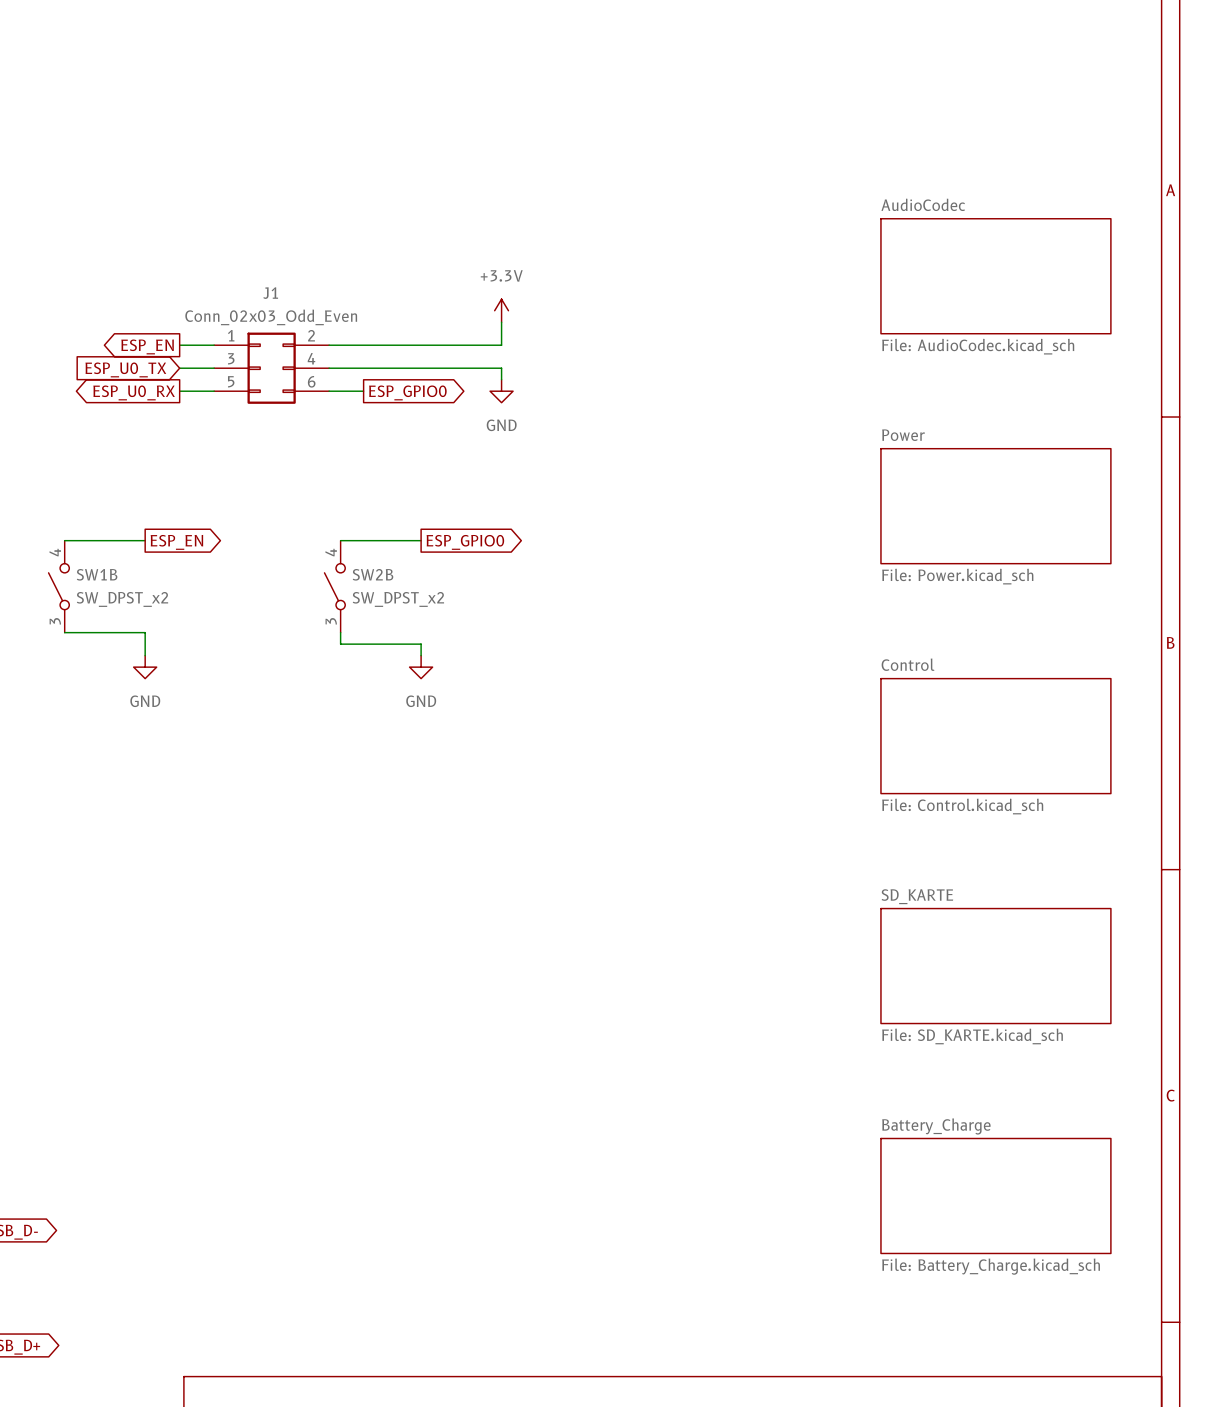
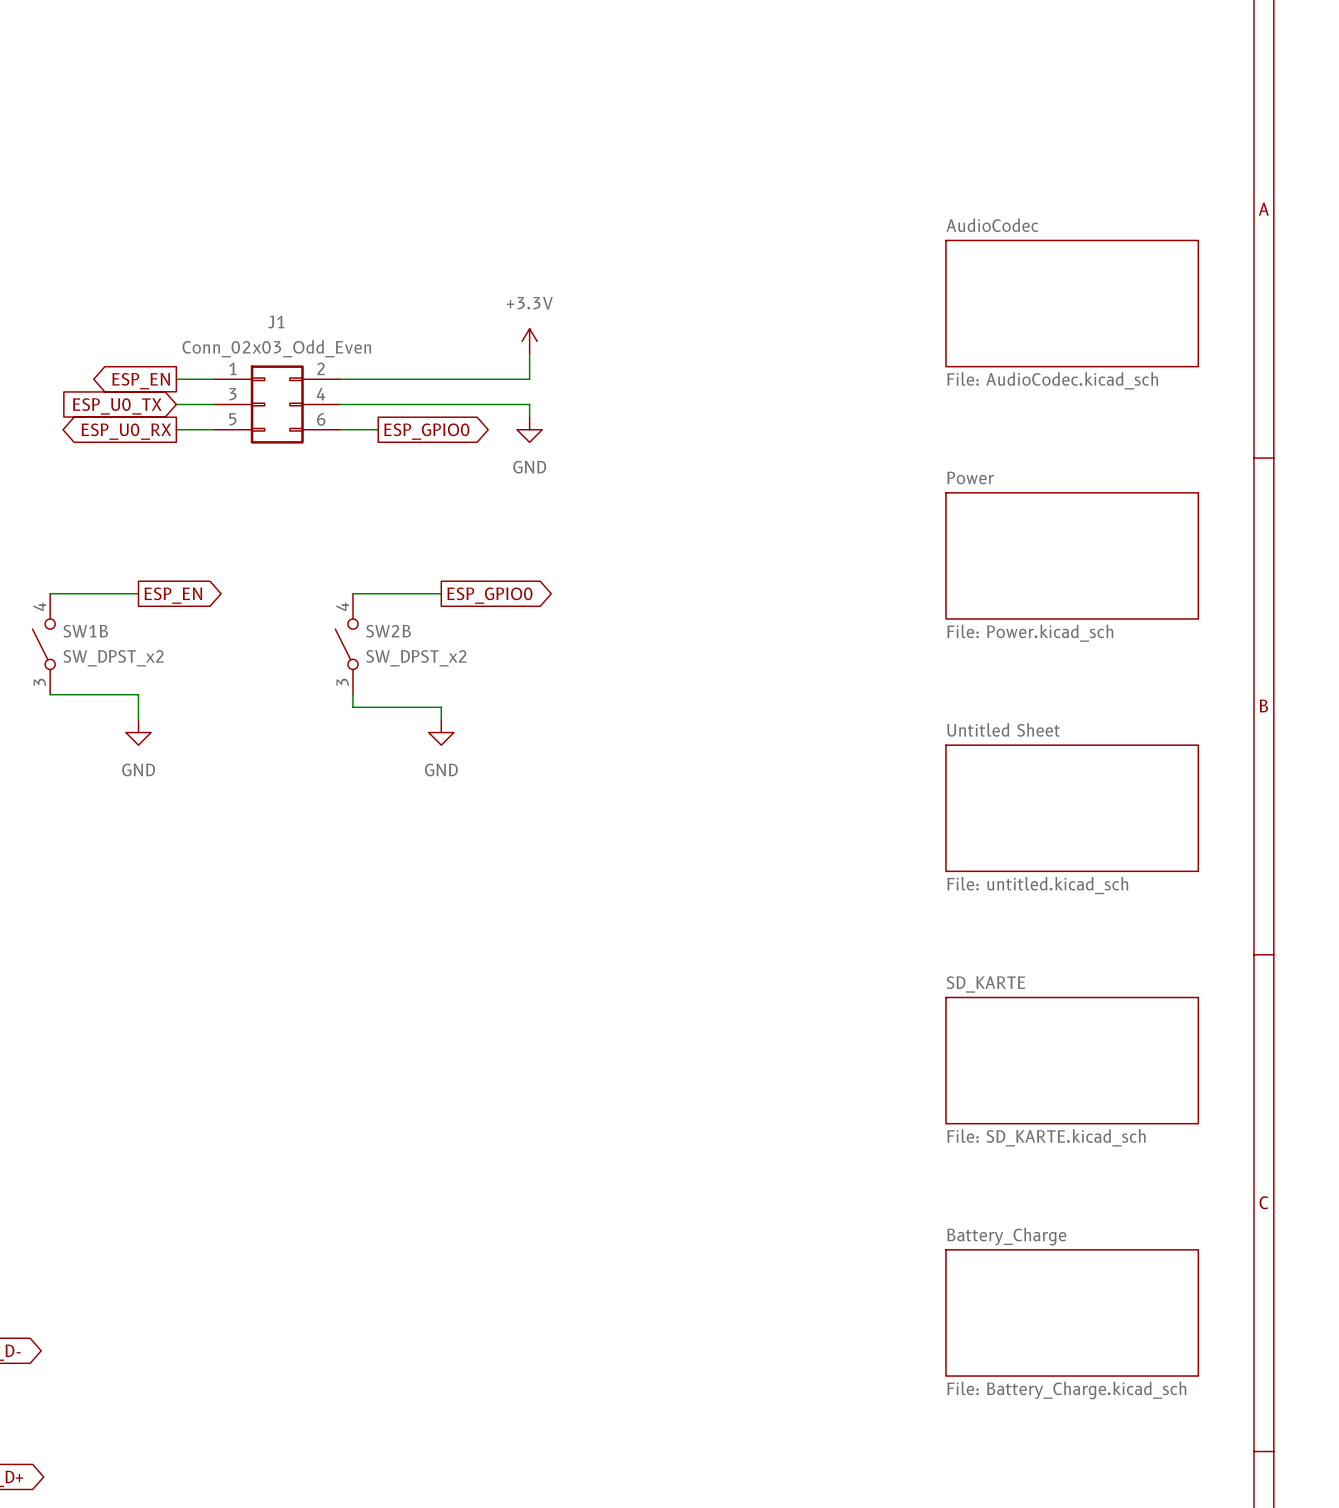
sheet Control name: Control (908, 664) -> Untitled Sheet (1003, 729)
sheet Control value: File: Control.kicad_sch (962, 806) -> File: untitled.kicad_sch (1037, 885)

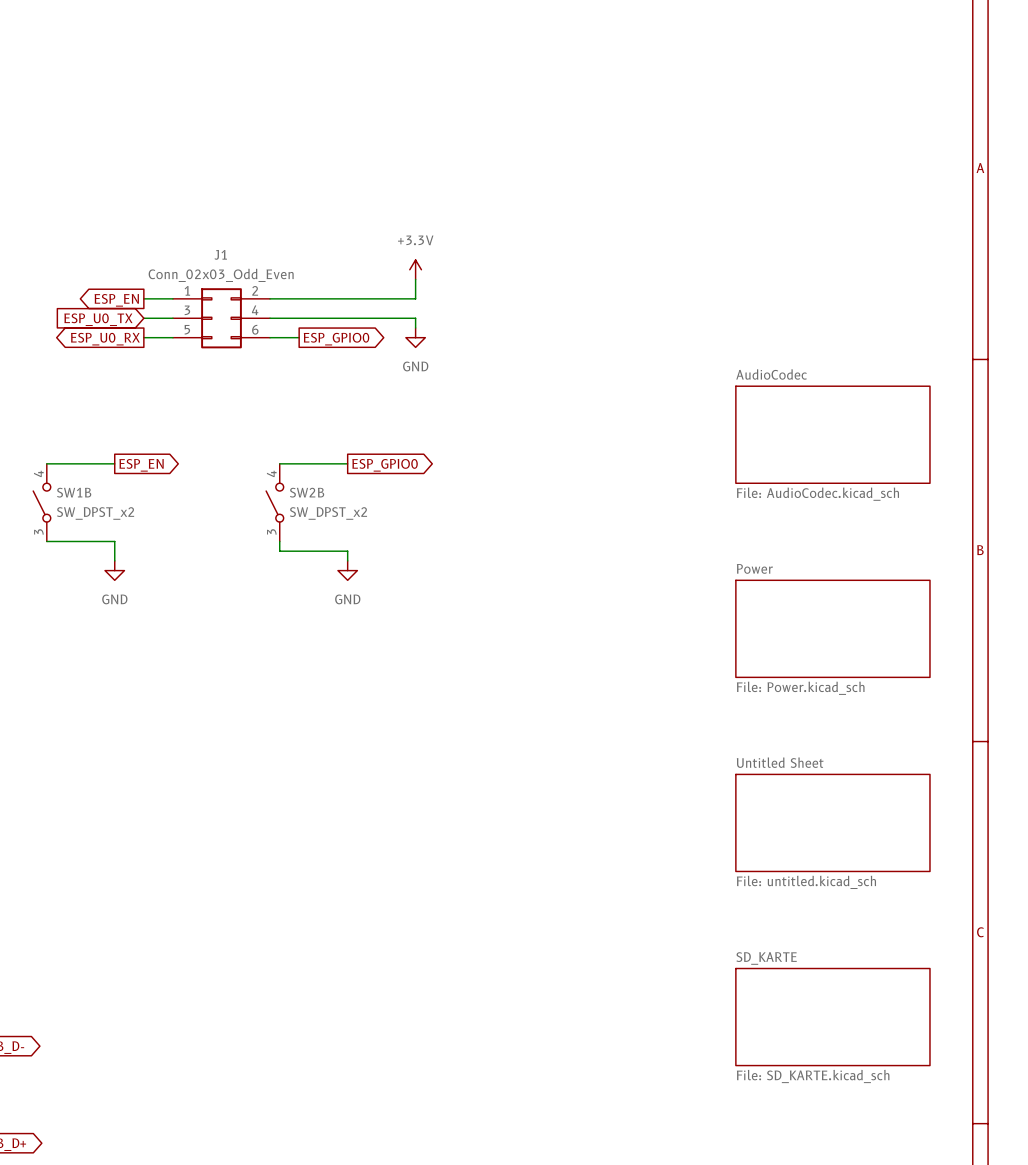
sheet AudioCodec: File: AudioCodec.kicad_sch (1072, 303) -> none
sheet Power name: Power (970, 478) -> AudioCodec (771, 374)
sheet Power value: File: Power.kicad_sch (1030, 633) -> File: AudioCodec.kicad_sch (817, 494)
sheet Untitled Sheet name: Untitled Sheet (1003, 729) -> Power (754, 568)
sheet Untitled Sheet value: File: untitled.kicad_sch (1037, 885) -> File: Power.kicad_sch (800, 688)
sheet SD_KARTE name: SD_KARTE (985, 984) -> Untitled Sheet (780, 762)
sheet SD_KARTE value: File: SD_KARTE.kicad_sch (1046, 1137) -> File: untitled.kicad_sch (806, 882)
sheet Battery_Charge name: Battery_Charge (1006, 1236) -> SD_KARTE (766, 958)
sheet Battery_Charge value: File: Battery_Charge.kicad_sch (1066, 1390) -> File: SD_KARTE.kicad_sch (813, 1076)

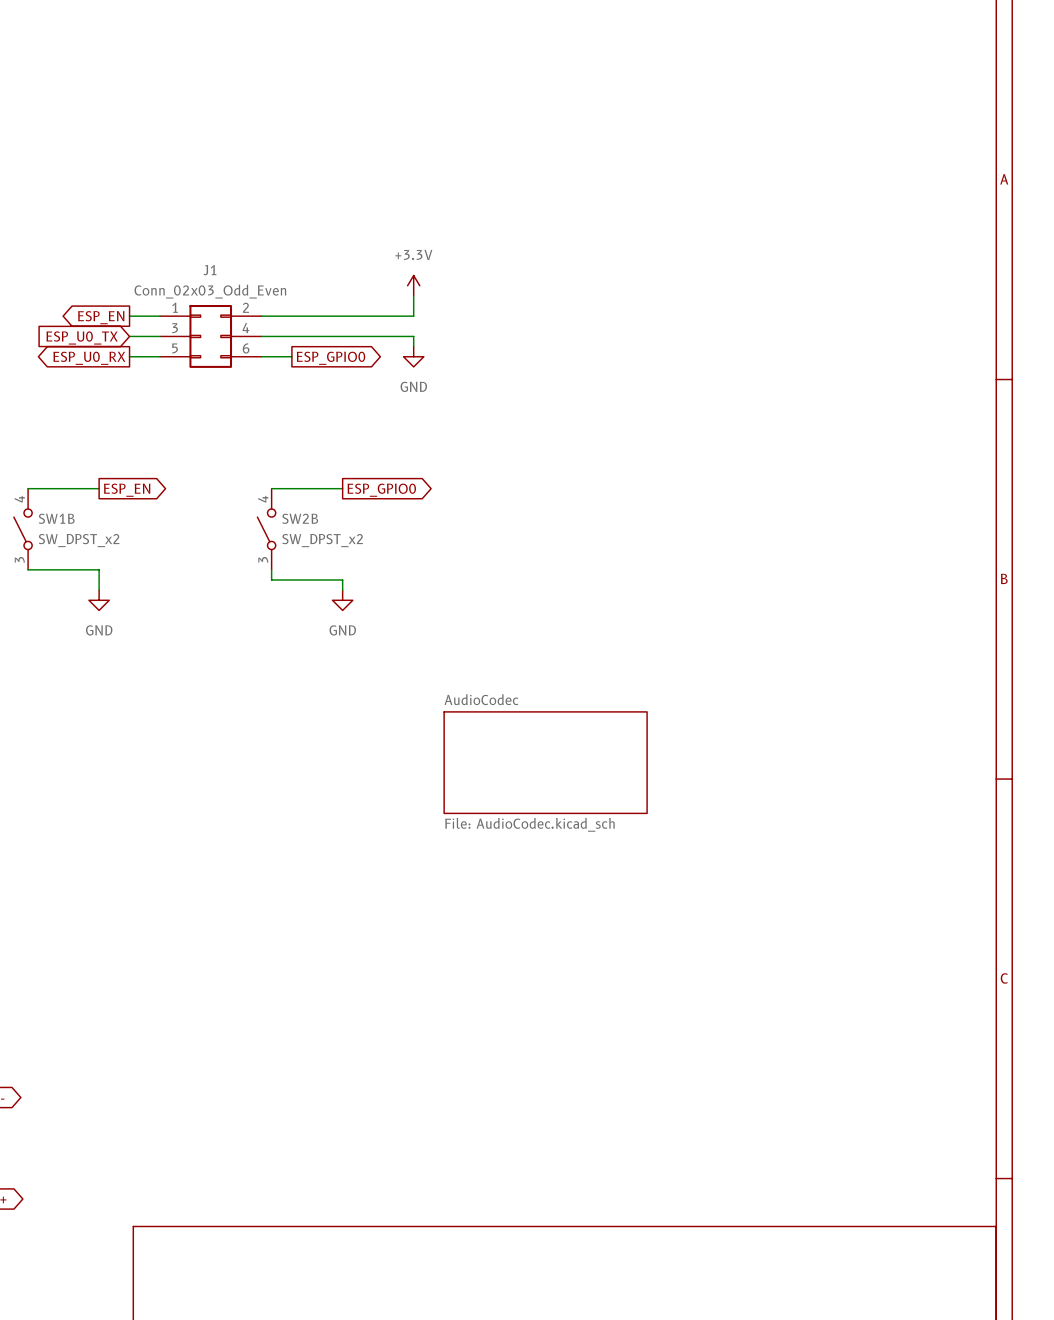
sheet AudioCodec: File: AudioCodec.kicad_sch (832, 434) -> none
sheet Power: File: Power.kicad_sch (832, 628) -> none
sheet AudioCodec: none -> File: AudioCodec.kicad_sch (545, 762)
sheet Untitled Sheet: File: untitled.kicad_sch (832, 822) -> none
sheet SD_KARTE: File: SD_KARTE.kicad_sch (832, 1017) -> none

